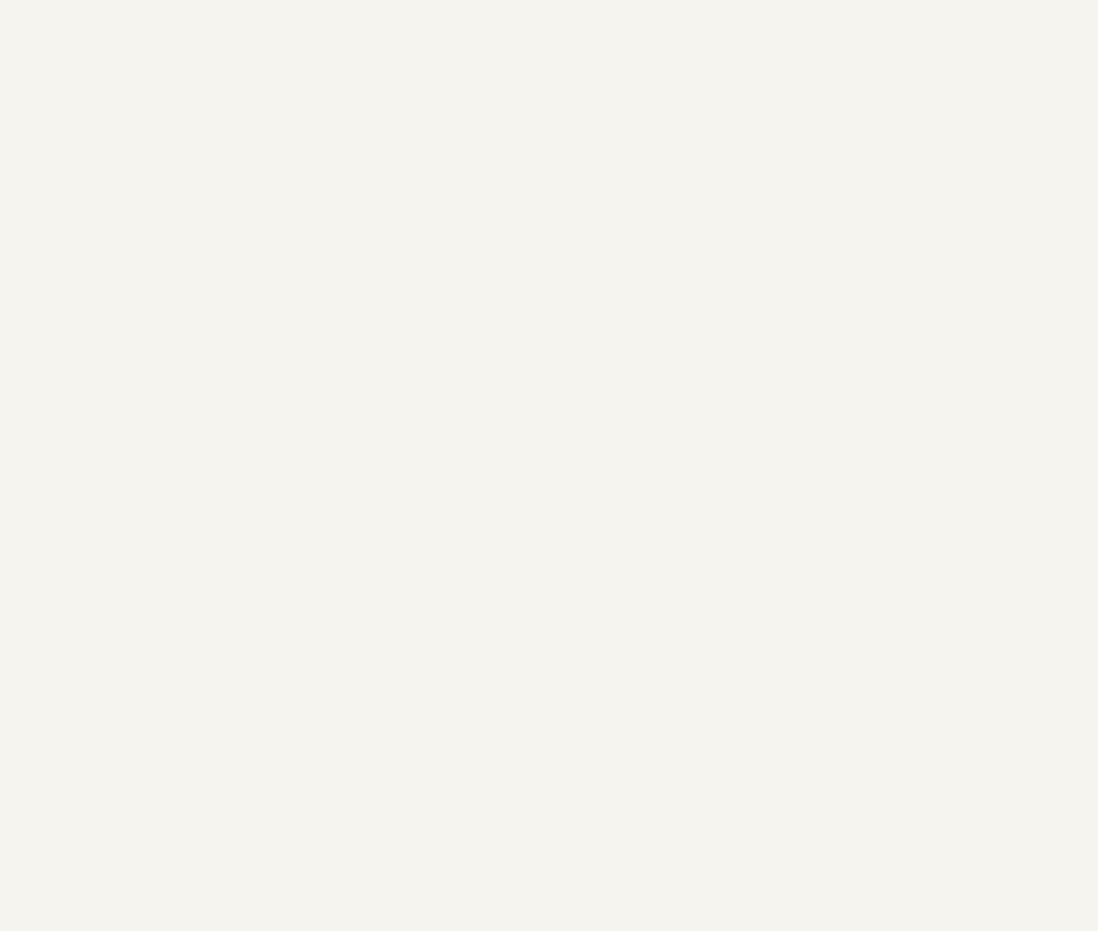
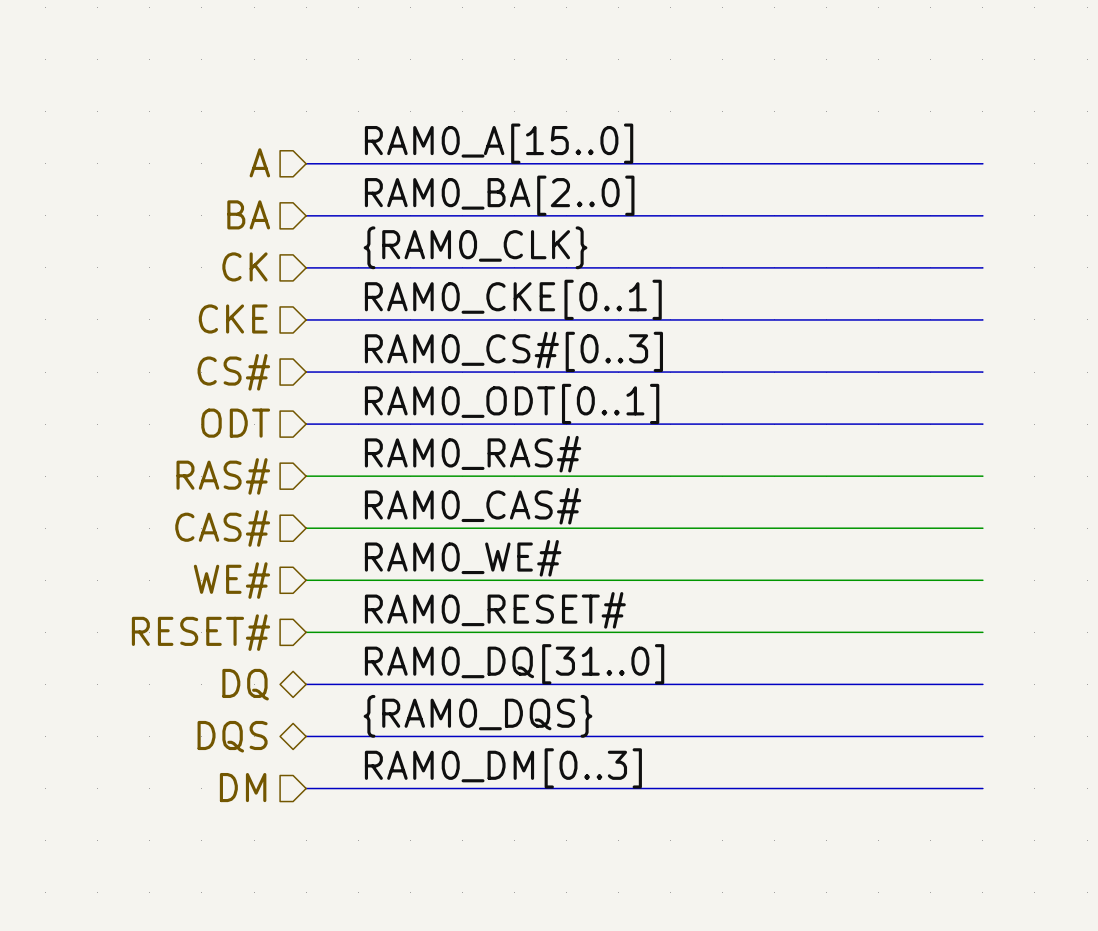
label: none -> RAM0_A[15..0] (499, 143)
hierarchical label: none -> A (259, 162)
bus: none -> (306, 163) (982, 163)
label: none -> RAM0_BA[2..0] (499, 195)
hierarchical label: none -> BA (248, 214)
bus: none -> (306, 215) (982, 215)
label: none -> {RAM0_CLK} (475, 247)
hierarchical label: none -> CK (244, 266)
bus: none -> (306, 267) (982, 267)
label: none -> RAM0_CKE[0..1] (513, 299)
hierarchical label: none -> CKE (233, 319)
bus: none -> (306, 319) (982, 319)
label: none -> RAM0_CS#[0..3] (513, 351)
hierarchical label: none -> CS# (233, 372)
bus: none -> (306, 372) (982, 372)
label: none -> RAM0_ODT[0..1] (512, 403)
hierarchical label: none -> ODT (235, 423)
bus: none -> (306, 424) (982, 424)
label: none -> RAM0_RAS# (473, 454)
hierarchical label: none -> RAS# (223, 476)
wire: none -> (306, 476) (982, 476)
label: none -> RAM0_CAS# (473, 506)
hierarchical label: none -> CAS# (222, 528)
wire: none -> (306, 528) (982, 528)
label: none -> RAM0_WE# (463, 558)
hierarchical label: none -> WE# (231, 580)
wire: none -> (306, 580) (982, 580)
label: none -> RAM0_RESET# (495, 610)
hierarchical label: none -> RESET# (200, 632)
wire: none -> (306, 632) (982, 632)
label: none -> RAM0_DQ[31..0] (514, 664)
bus: none -> (306, 684) (982, 684)
hierarchical label: none -> DQ (245, 684)
label: none -> {RAM0_DQS} (477, 716)
bus: none -> (306, 736) (982, 736)
hierarchical label: none -> DQS (232, 736)
label: none -> RAM0_DM[0..3] (503, 768)
hierarchical label: none -> DM (243, 787)
bus: none -> (306, 788) (982, 788)

